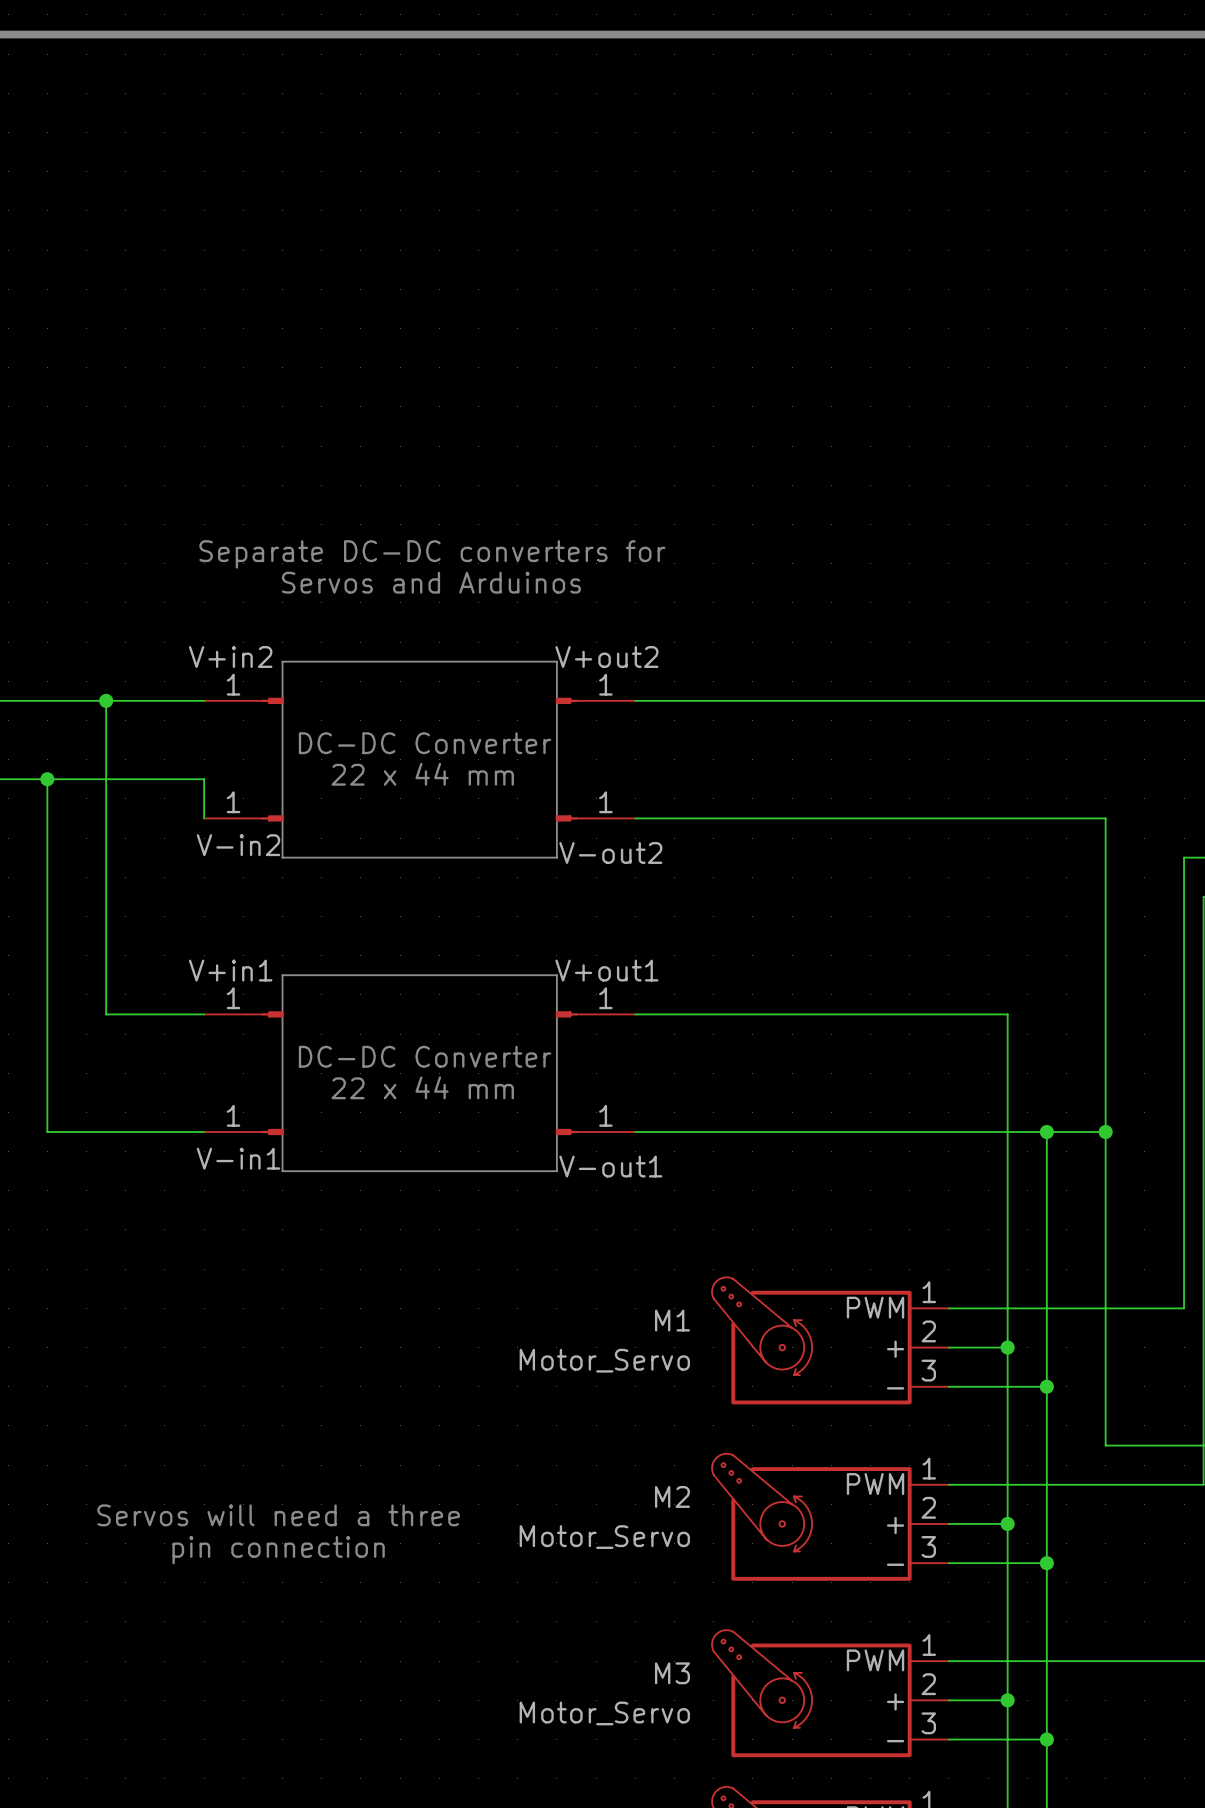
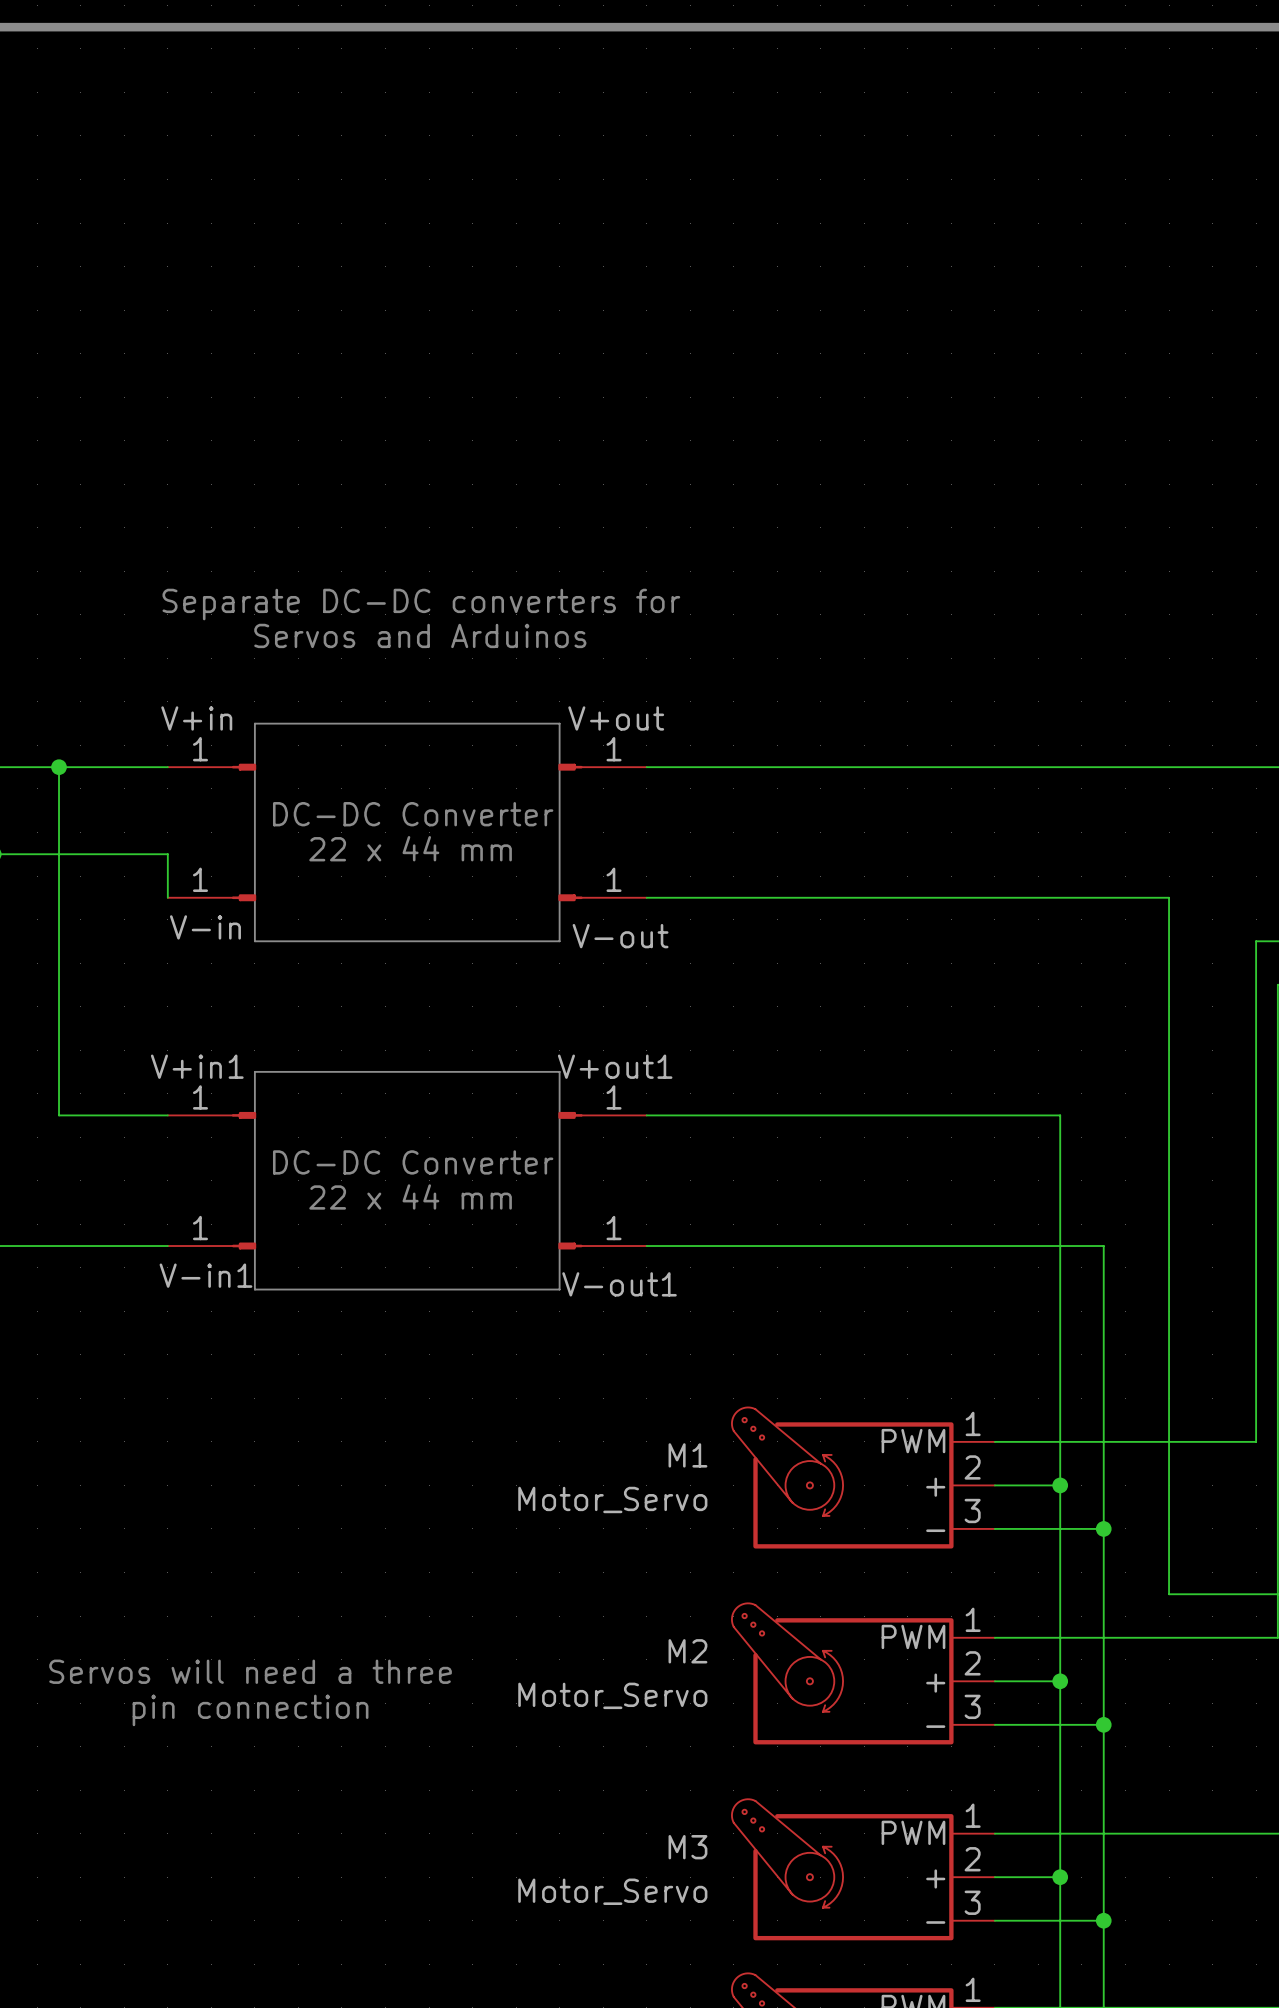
V+in2 name: V+in2 (230, 657) -> V+in (196, 718)
V+out2 name: V+out2 (606, 657) -> V+out (616, 718)
V-in2 name: V-in2 (238, 845) -> V-in (205, 927)
V-out2 name: V-out2 (610, 852) -> V-out (620, 936)
wire: (1046, 1132) (1105, 1132) -> none
junction: (1046, 1132) -> none
junction: (1105, 1132) -> none

